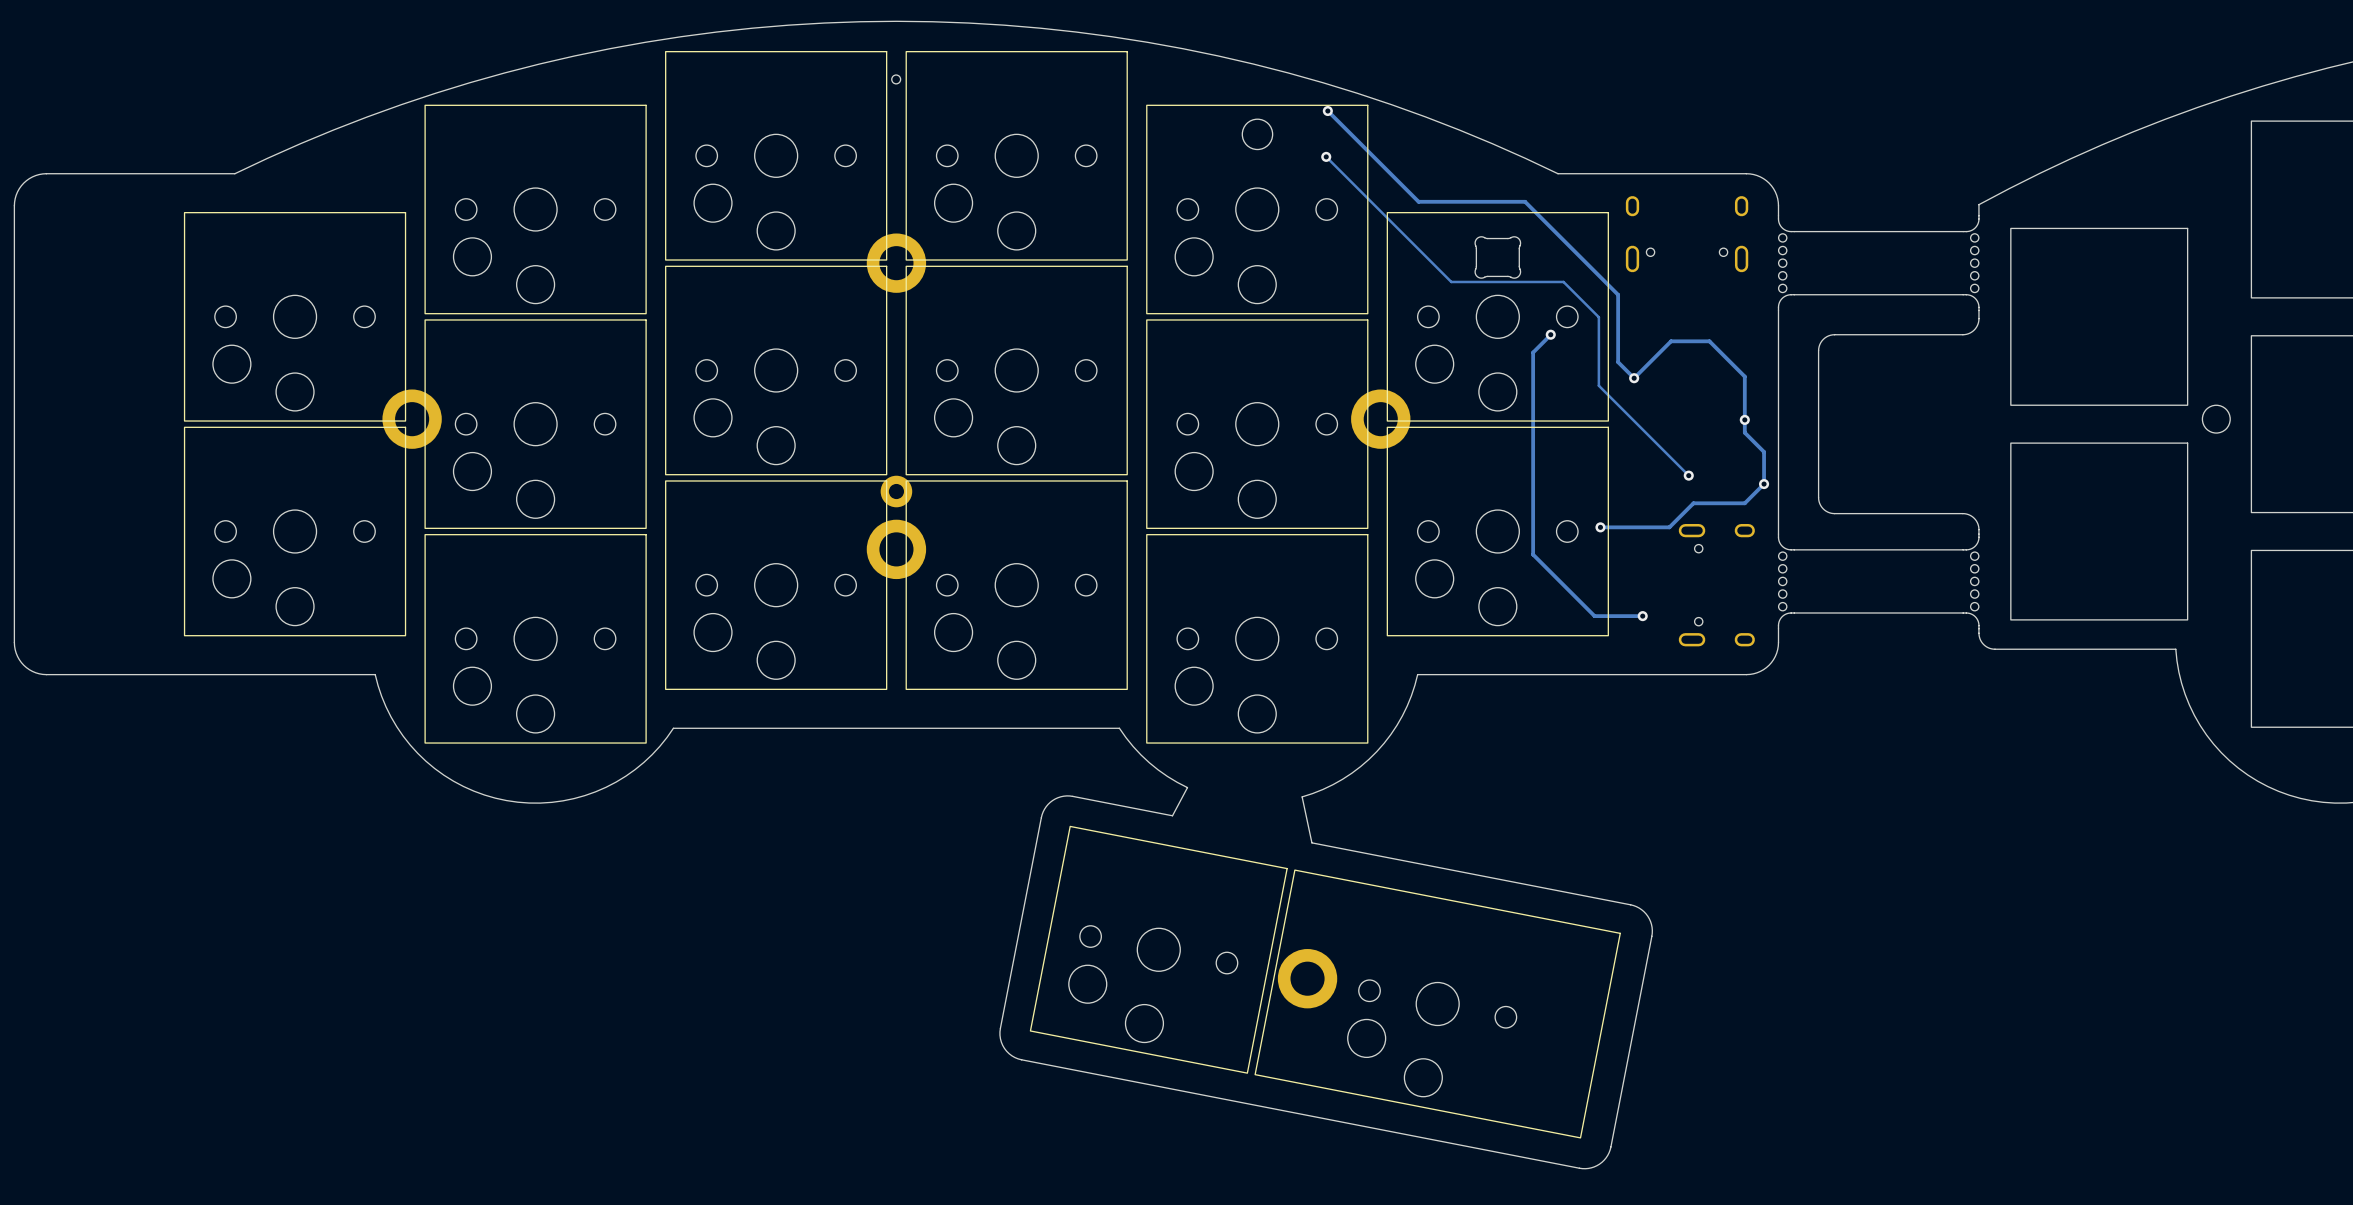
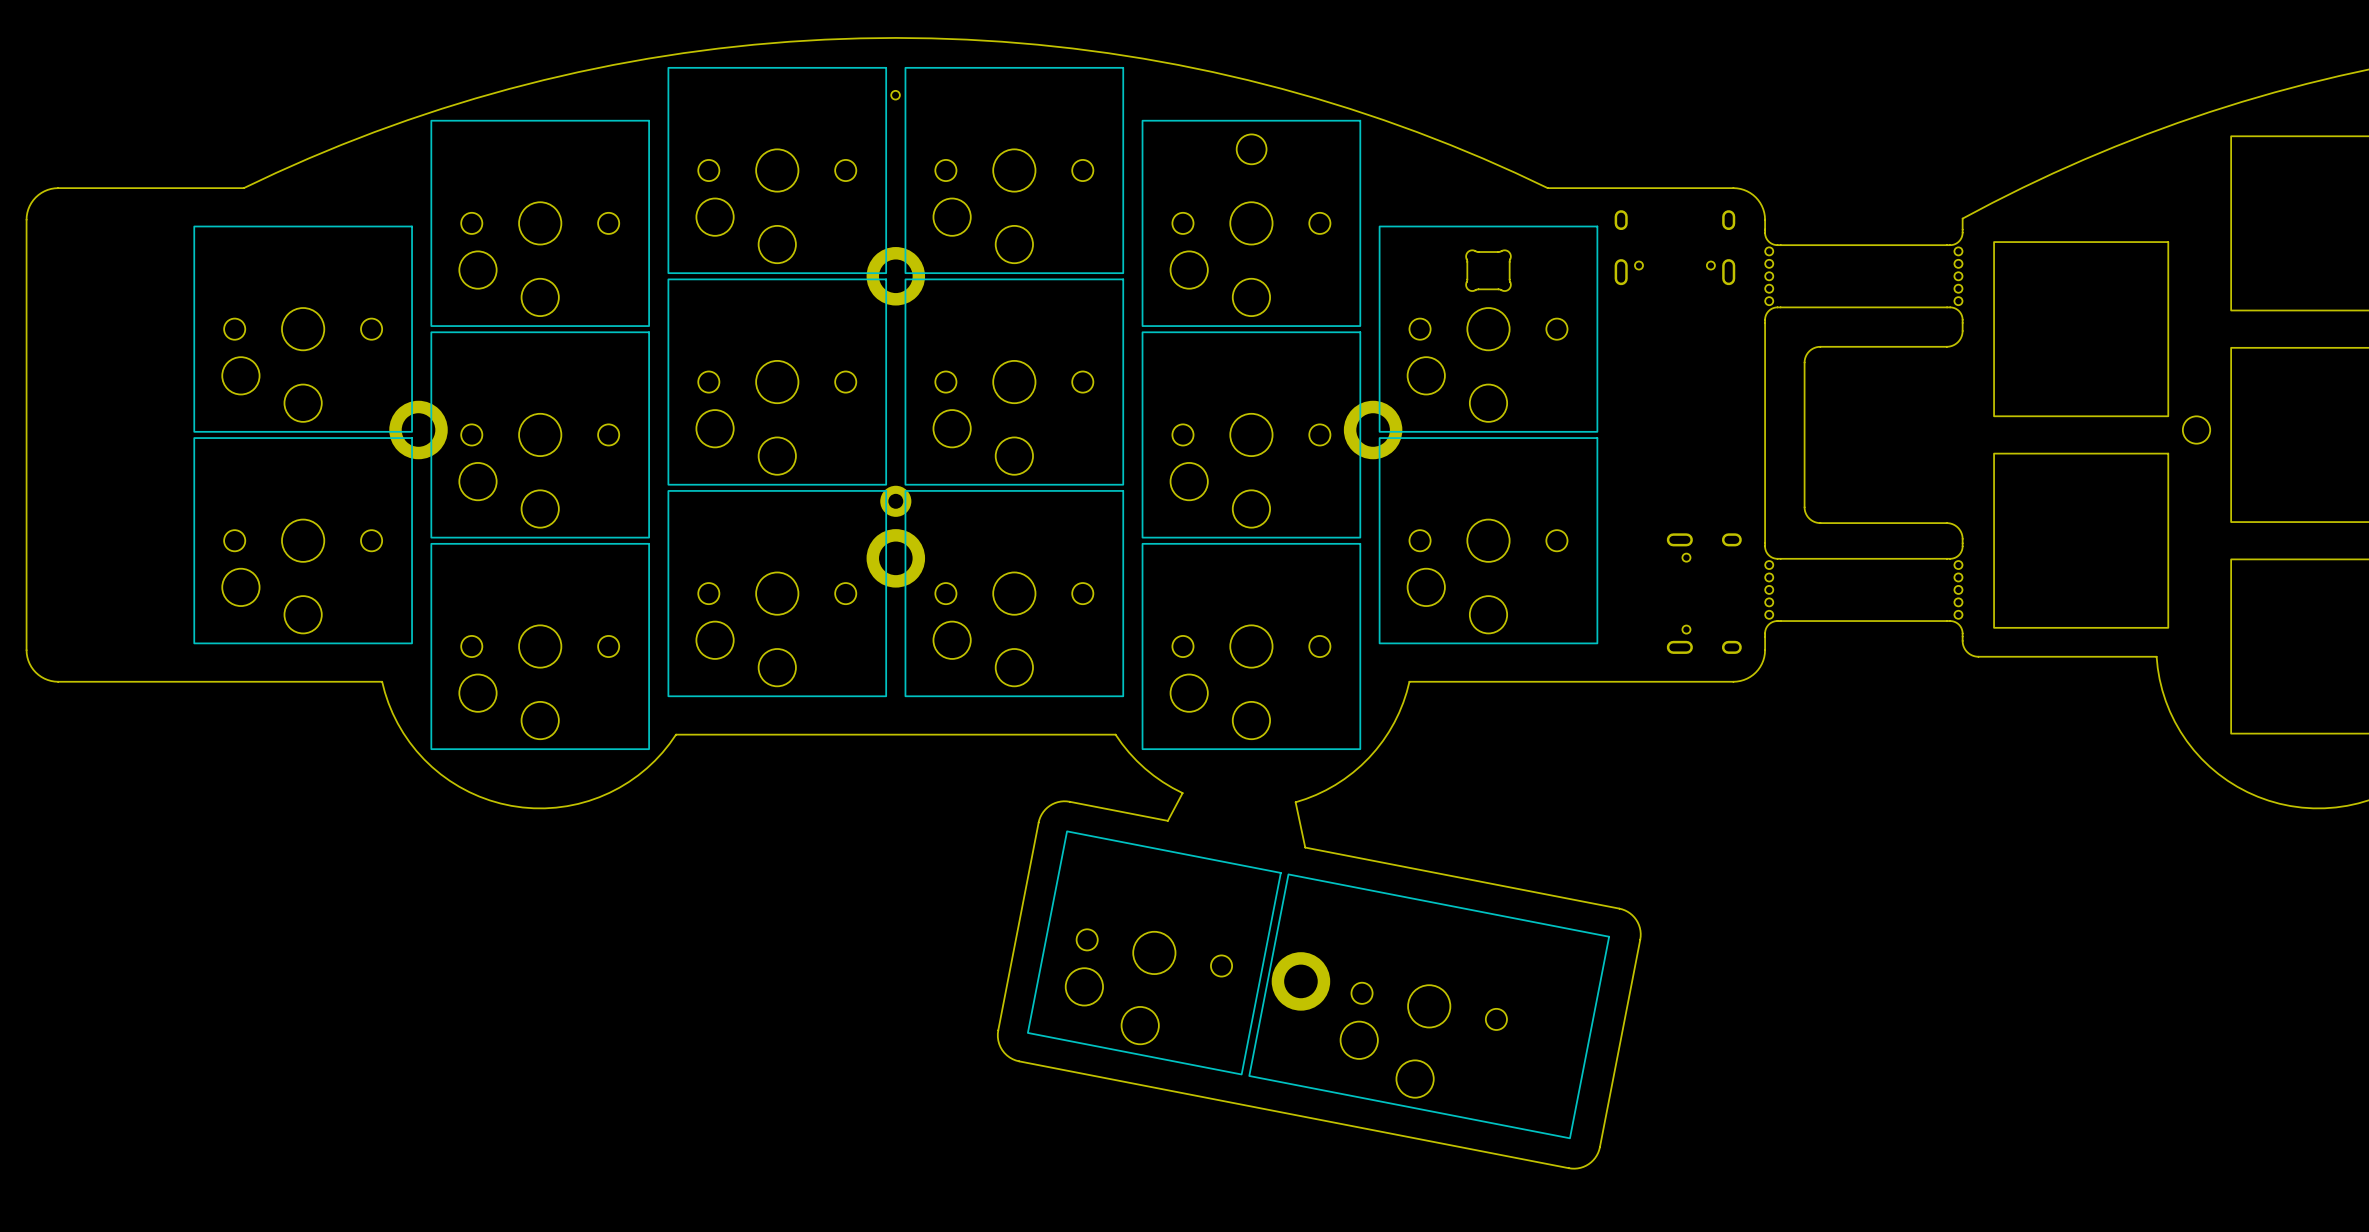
track: (1327, 111) (1418, 201) (1525, 201) (1618, 294) (1618, 362) (1634, 378) (1671, 341) (1709, 341) (1744, 376) (1744, 432) (1764, 451) (1764, 484) (1744, 503) (1693, 503) (1669, 527) (1600, 527) -> none
via: (1327, 111) -> none
track: (1326, 156) (1451, 281) (1563, 281) (1598, 317) (1598, 385) (1688, 475) -> none
via: (1326, 156) -> none
track: (1550, 334) (1533, 352) (1533, 554) (1594, 616) (1642, 616) -> none
via: (1550, 334) -> none
via: (1634, 378) -> none
via: (1744, 419) -> none
via: (1688, 475) -> none
via: (1764, 484) -> none
via: (1600, 527) -> none
via: (1642, 616) -> none

